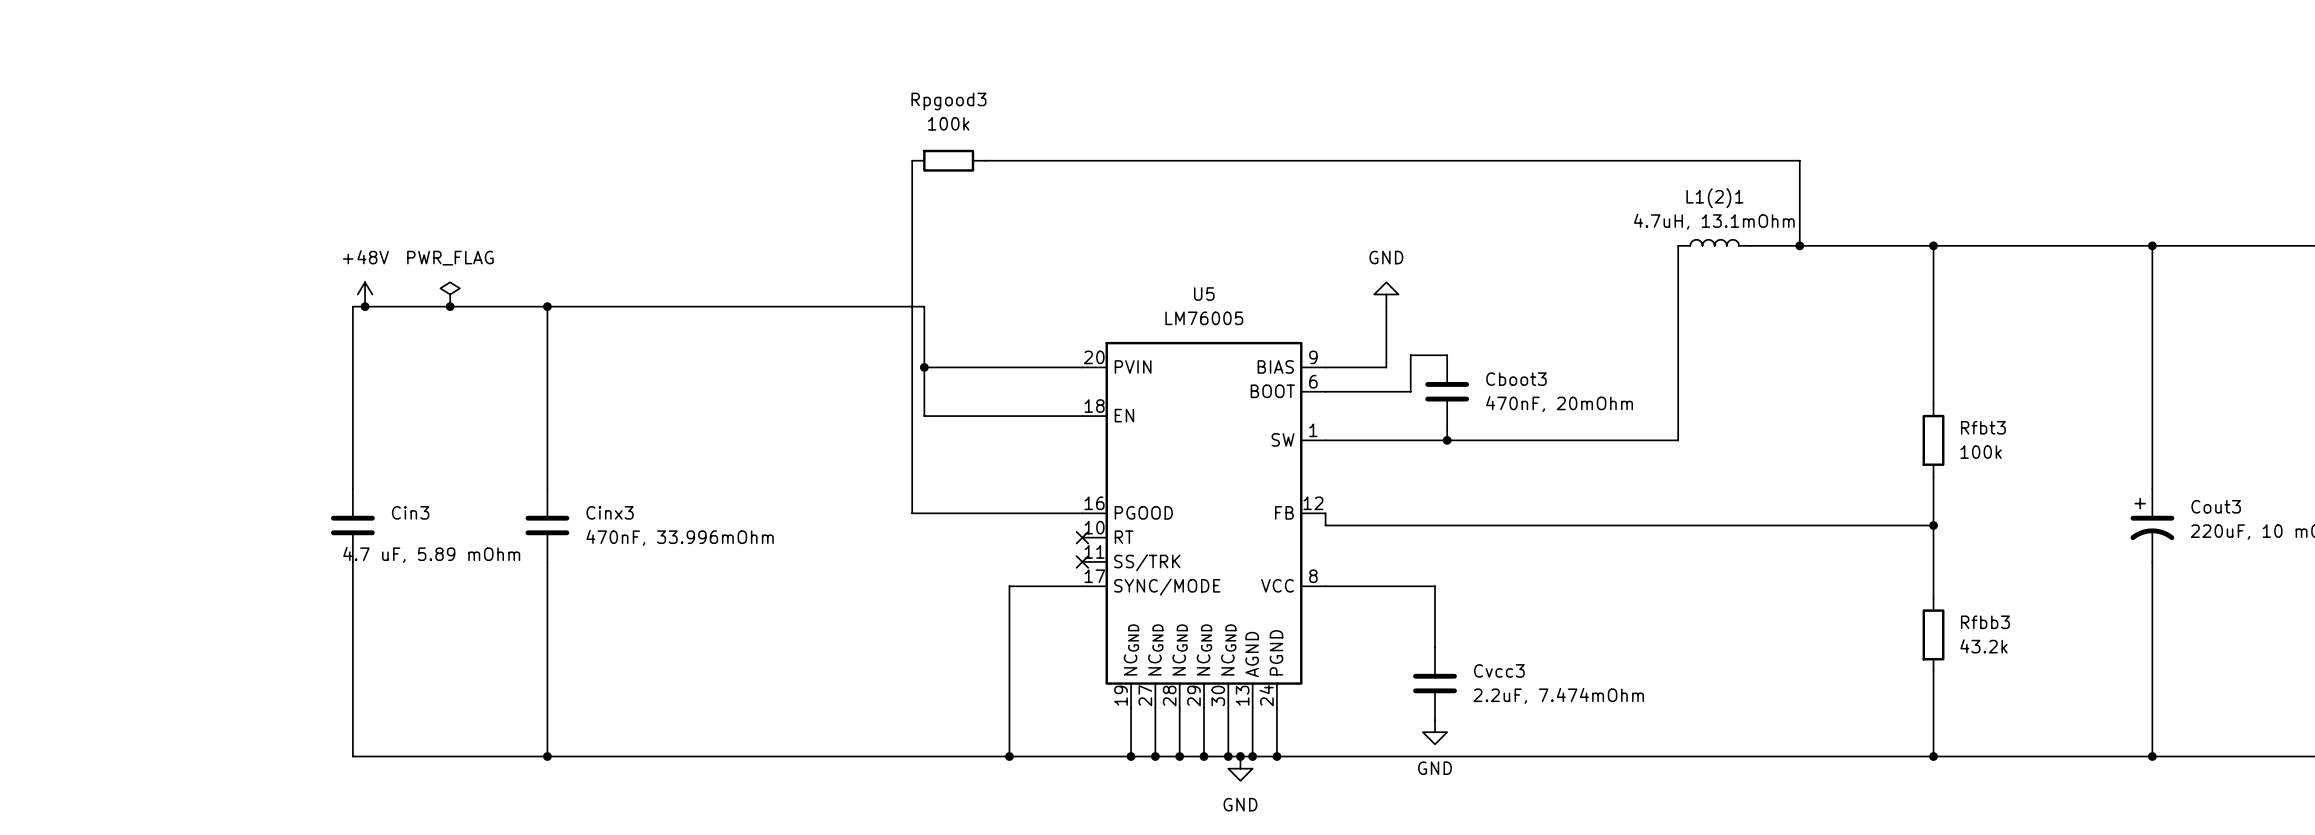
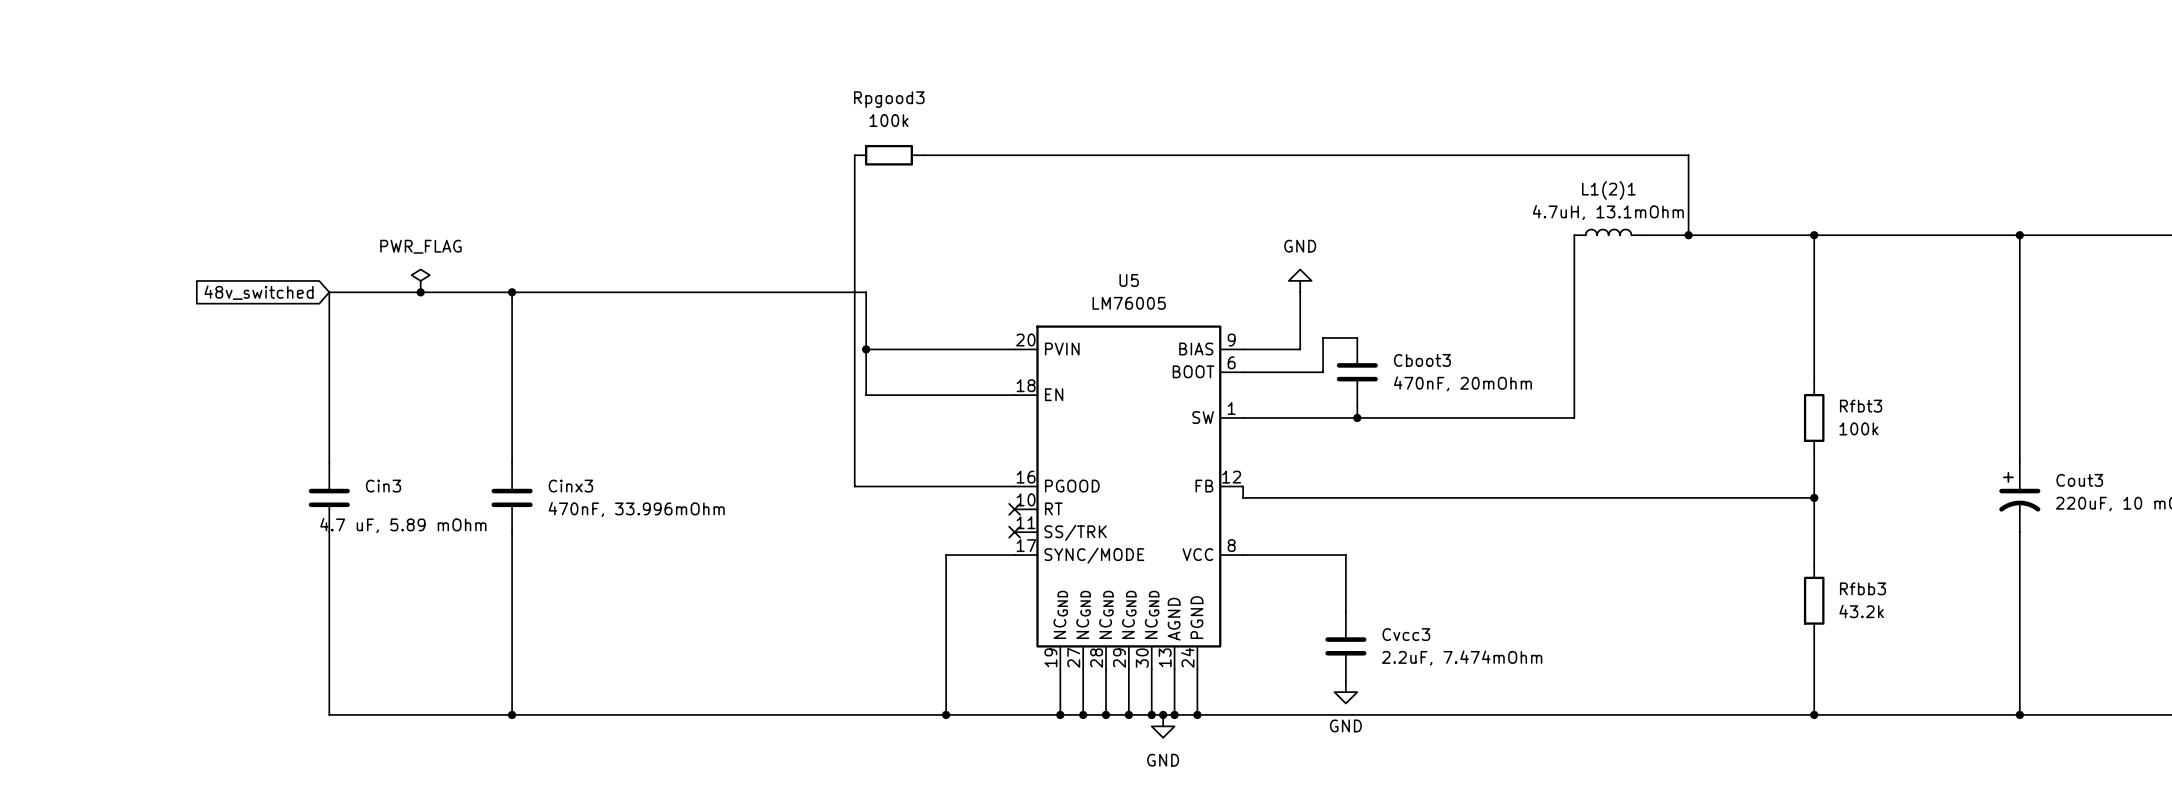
power symbol: +48V (365, 294) -> none
global label: none -> 48v_switched (258, 292)
junction: (365, 306) -> none

